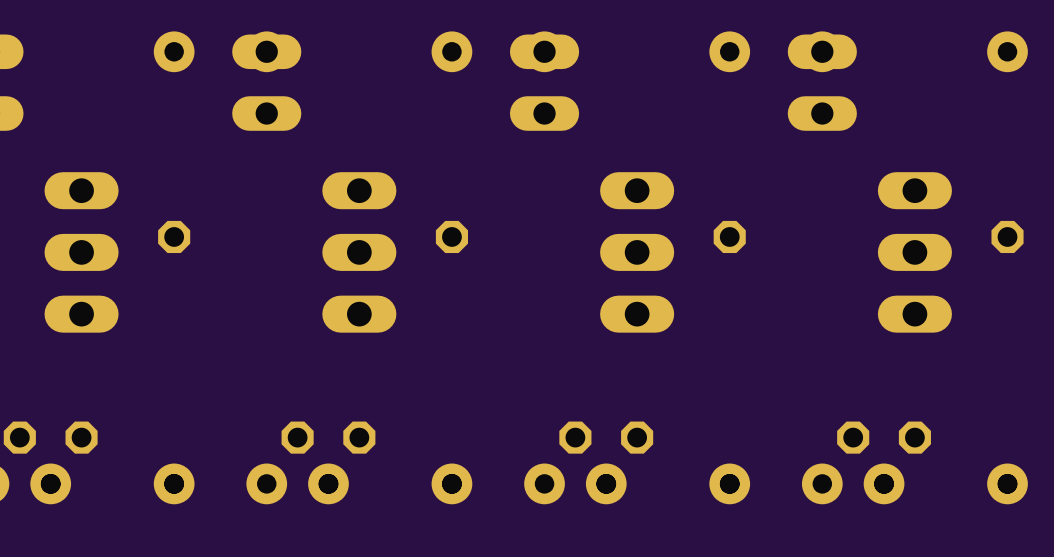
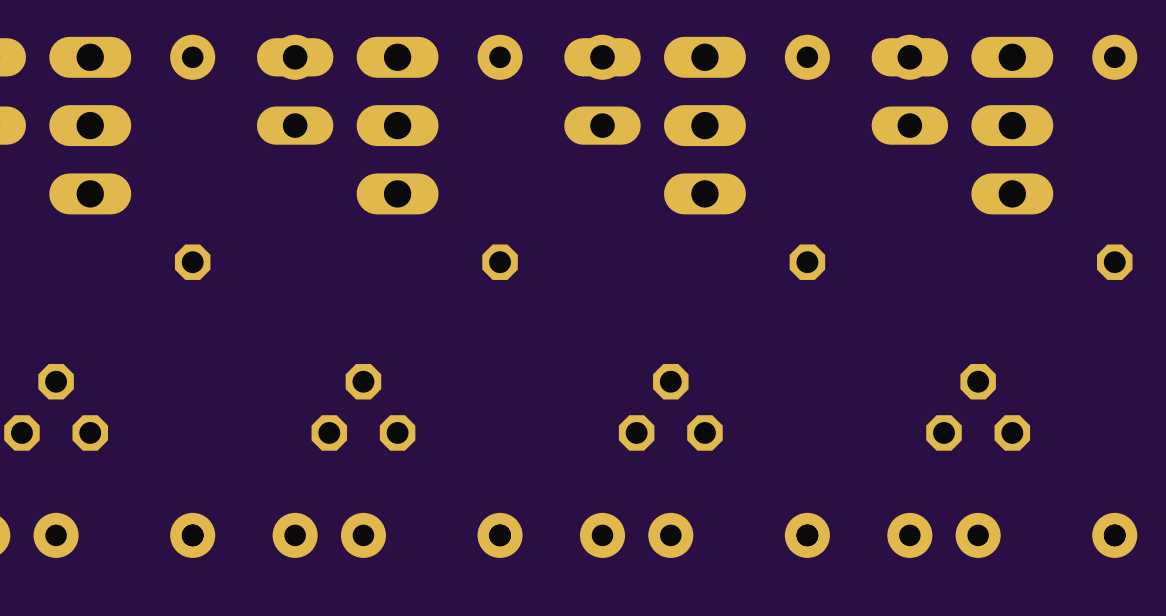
part position: (81, 252) -> (90, 125)
part position: (359, 252) -> (397, 125)
part position: (637, 252) -> (704, 125)
part position: (914, 252) -> (1012, 125)
part rotation: 0° (50, 460) -> 180° (56, 407)
part position: (50, 460) -> (56, 407)
part rotation: 0° (328, 460) -> 180° (363, 407)
part position: (328, 460) -> (363, 407)
part rotation: 0° (606, 460) -> 180° (670, 407)
part position: (606, 460) -> (670, 407)
part rotation: 0° (884, 460) -> 180° (978, 407)
part position: (884, 460) -> (978, 407)

